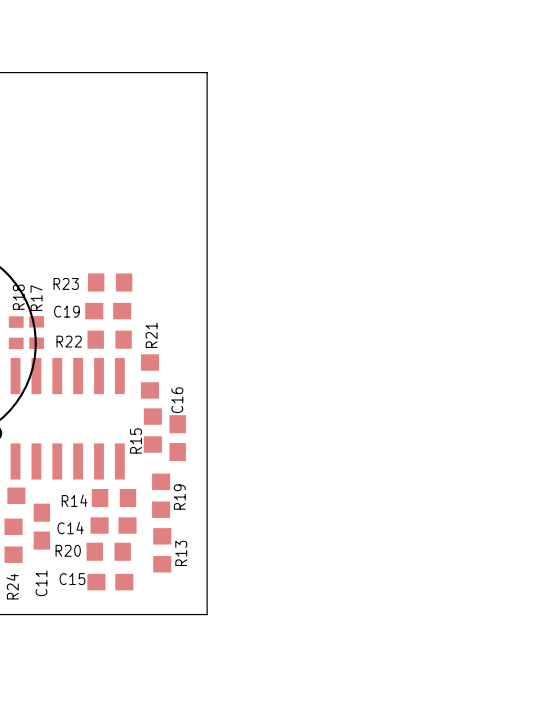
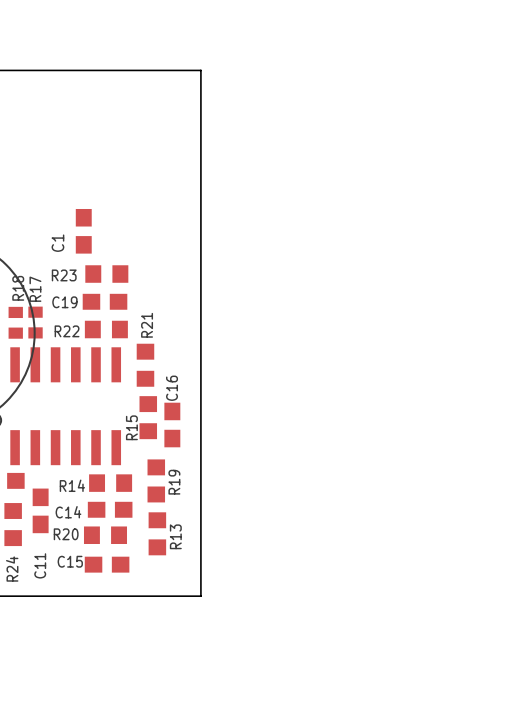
C1: none -> (83, 231)

